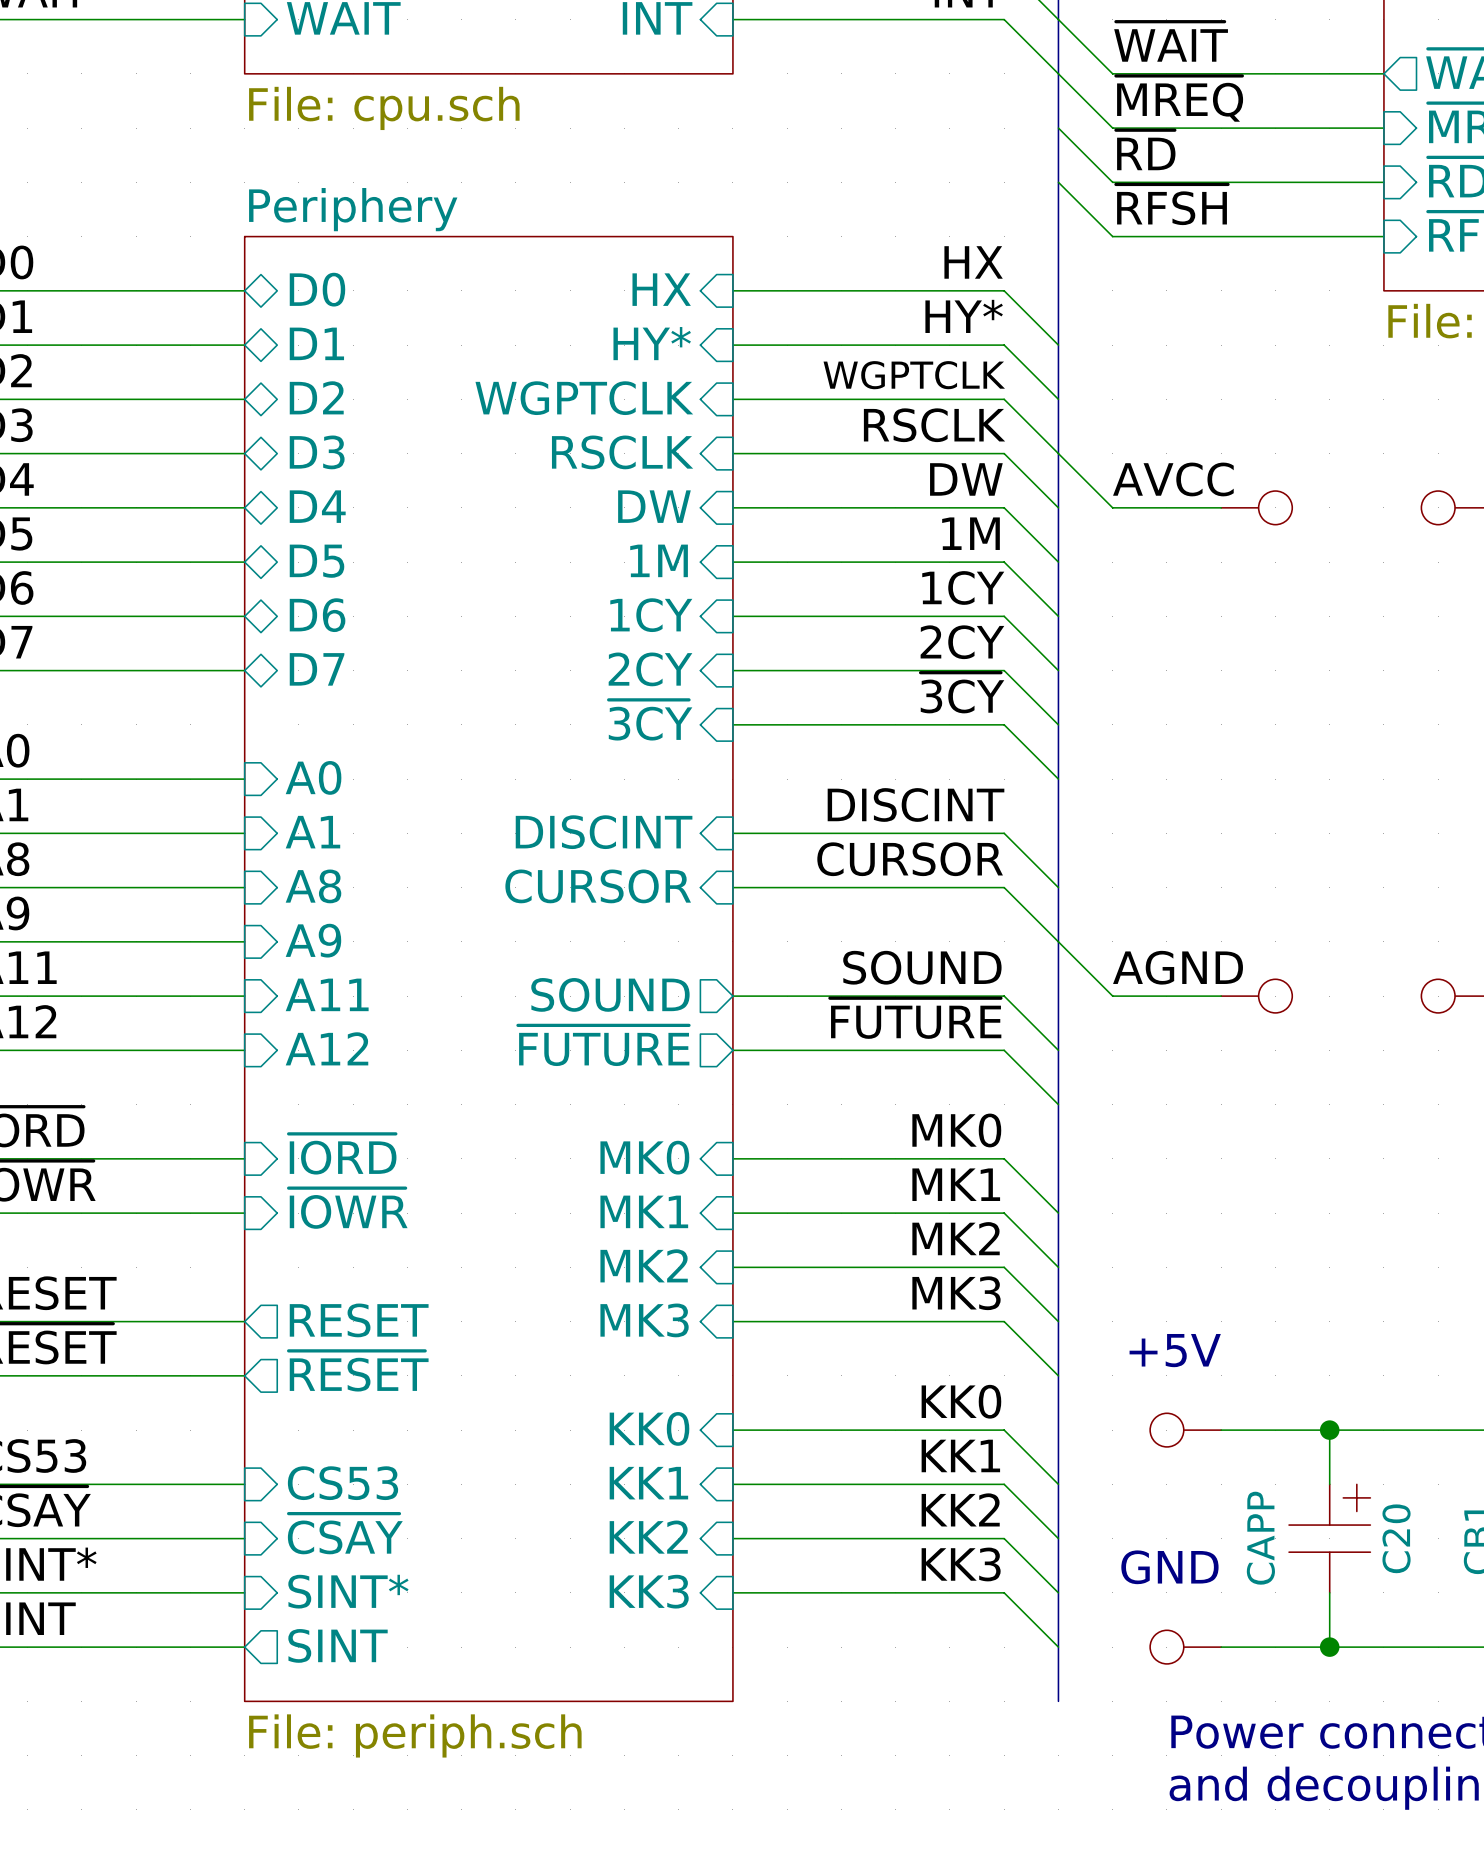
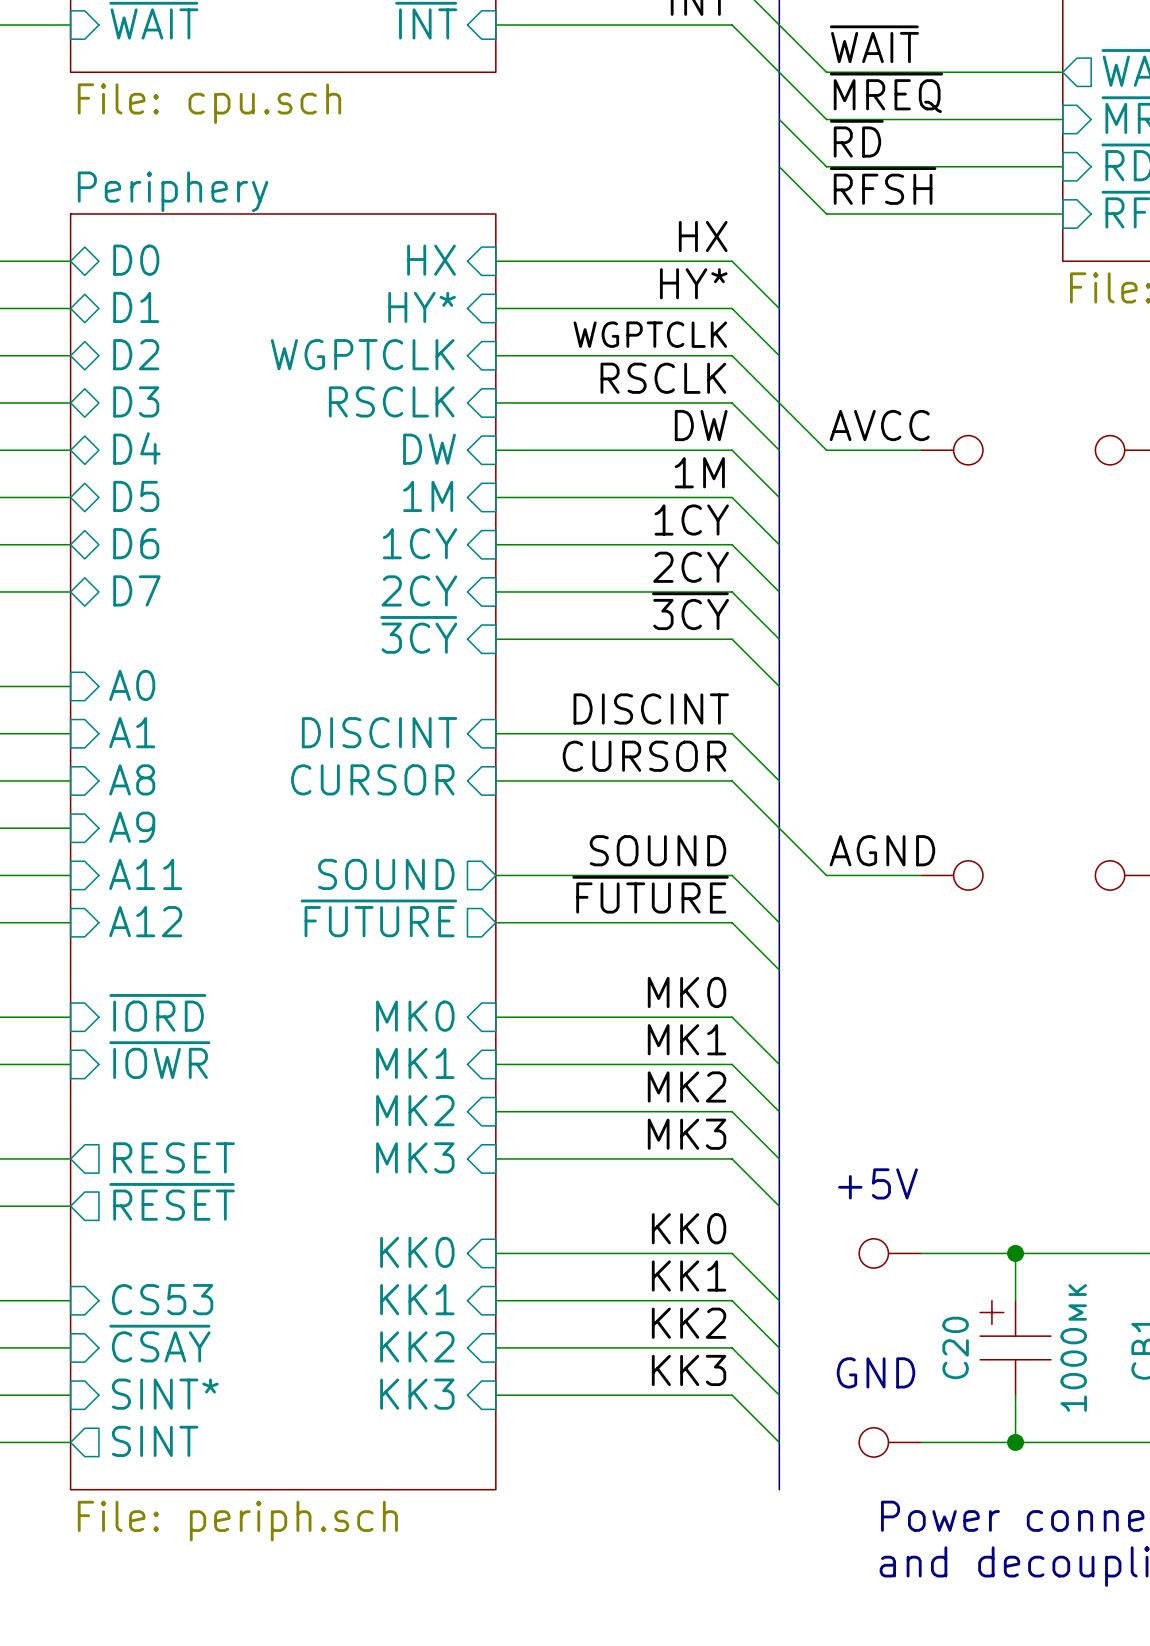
C20 flip: as is (1329, 1518) -> left-right (1015, 1330)
C20 value: CAPP (1260, 1538) -> 1000мк (1073, 1347)

